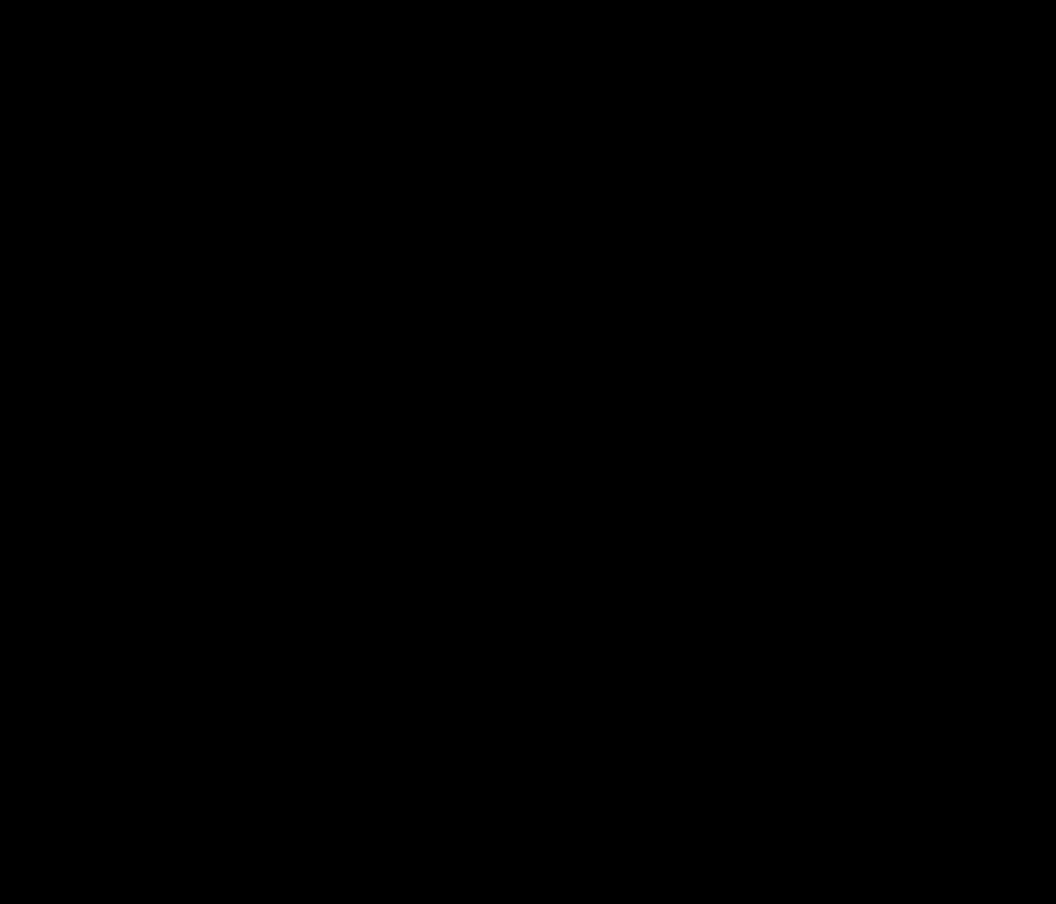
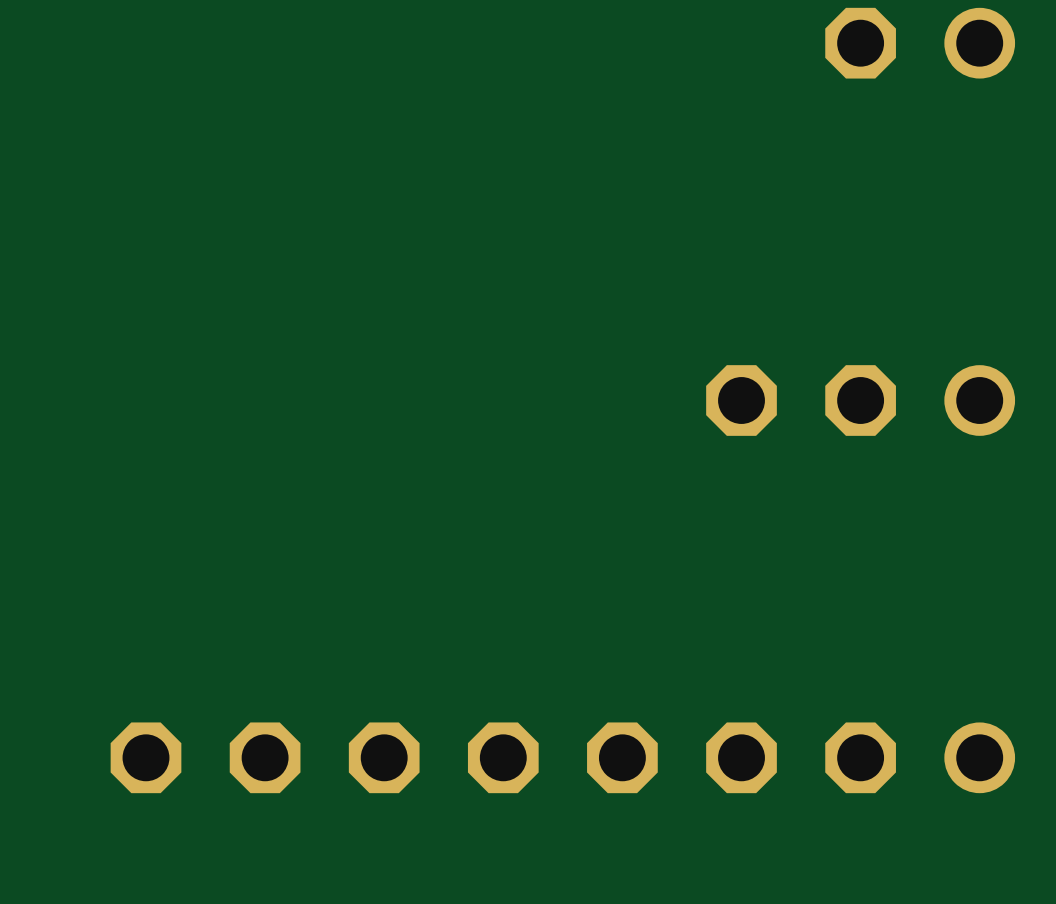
part: none -> (920, 43)
part: none -> (860, 400)
part: none -> (562, 757)

